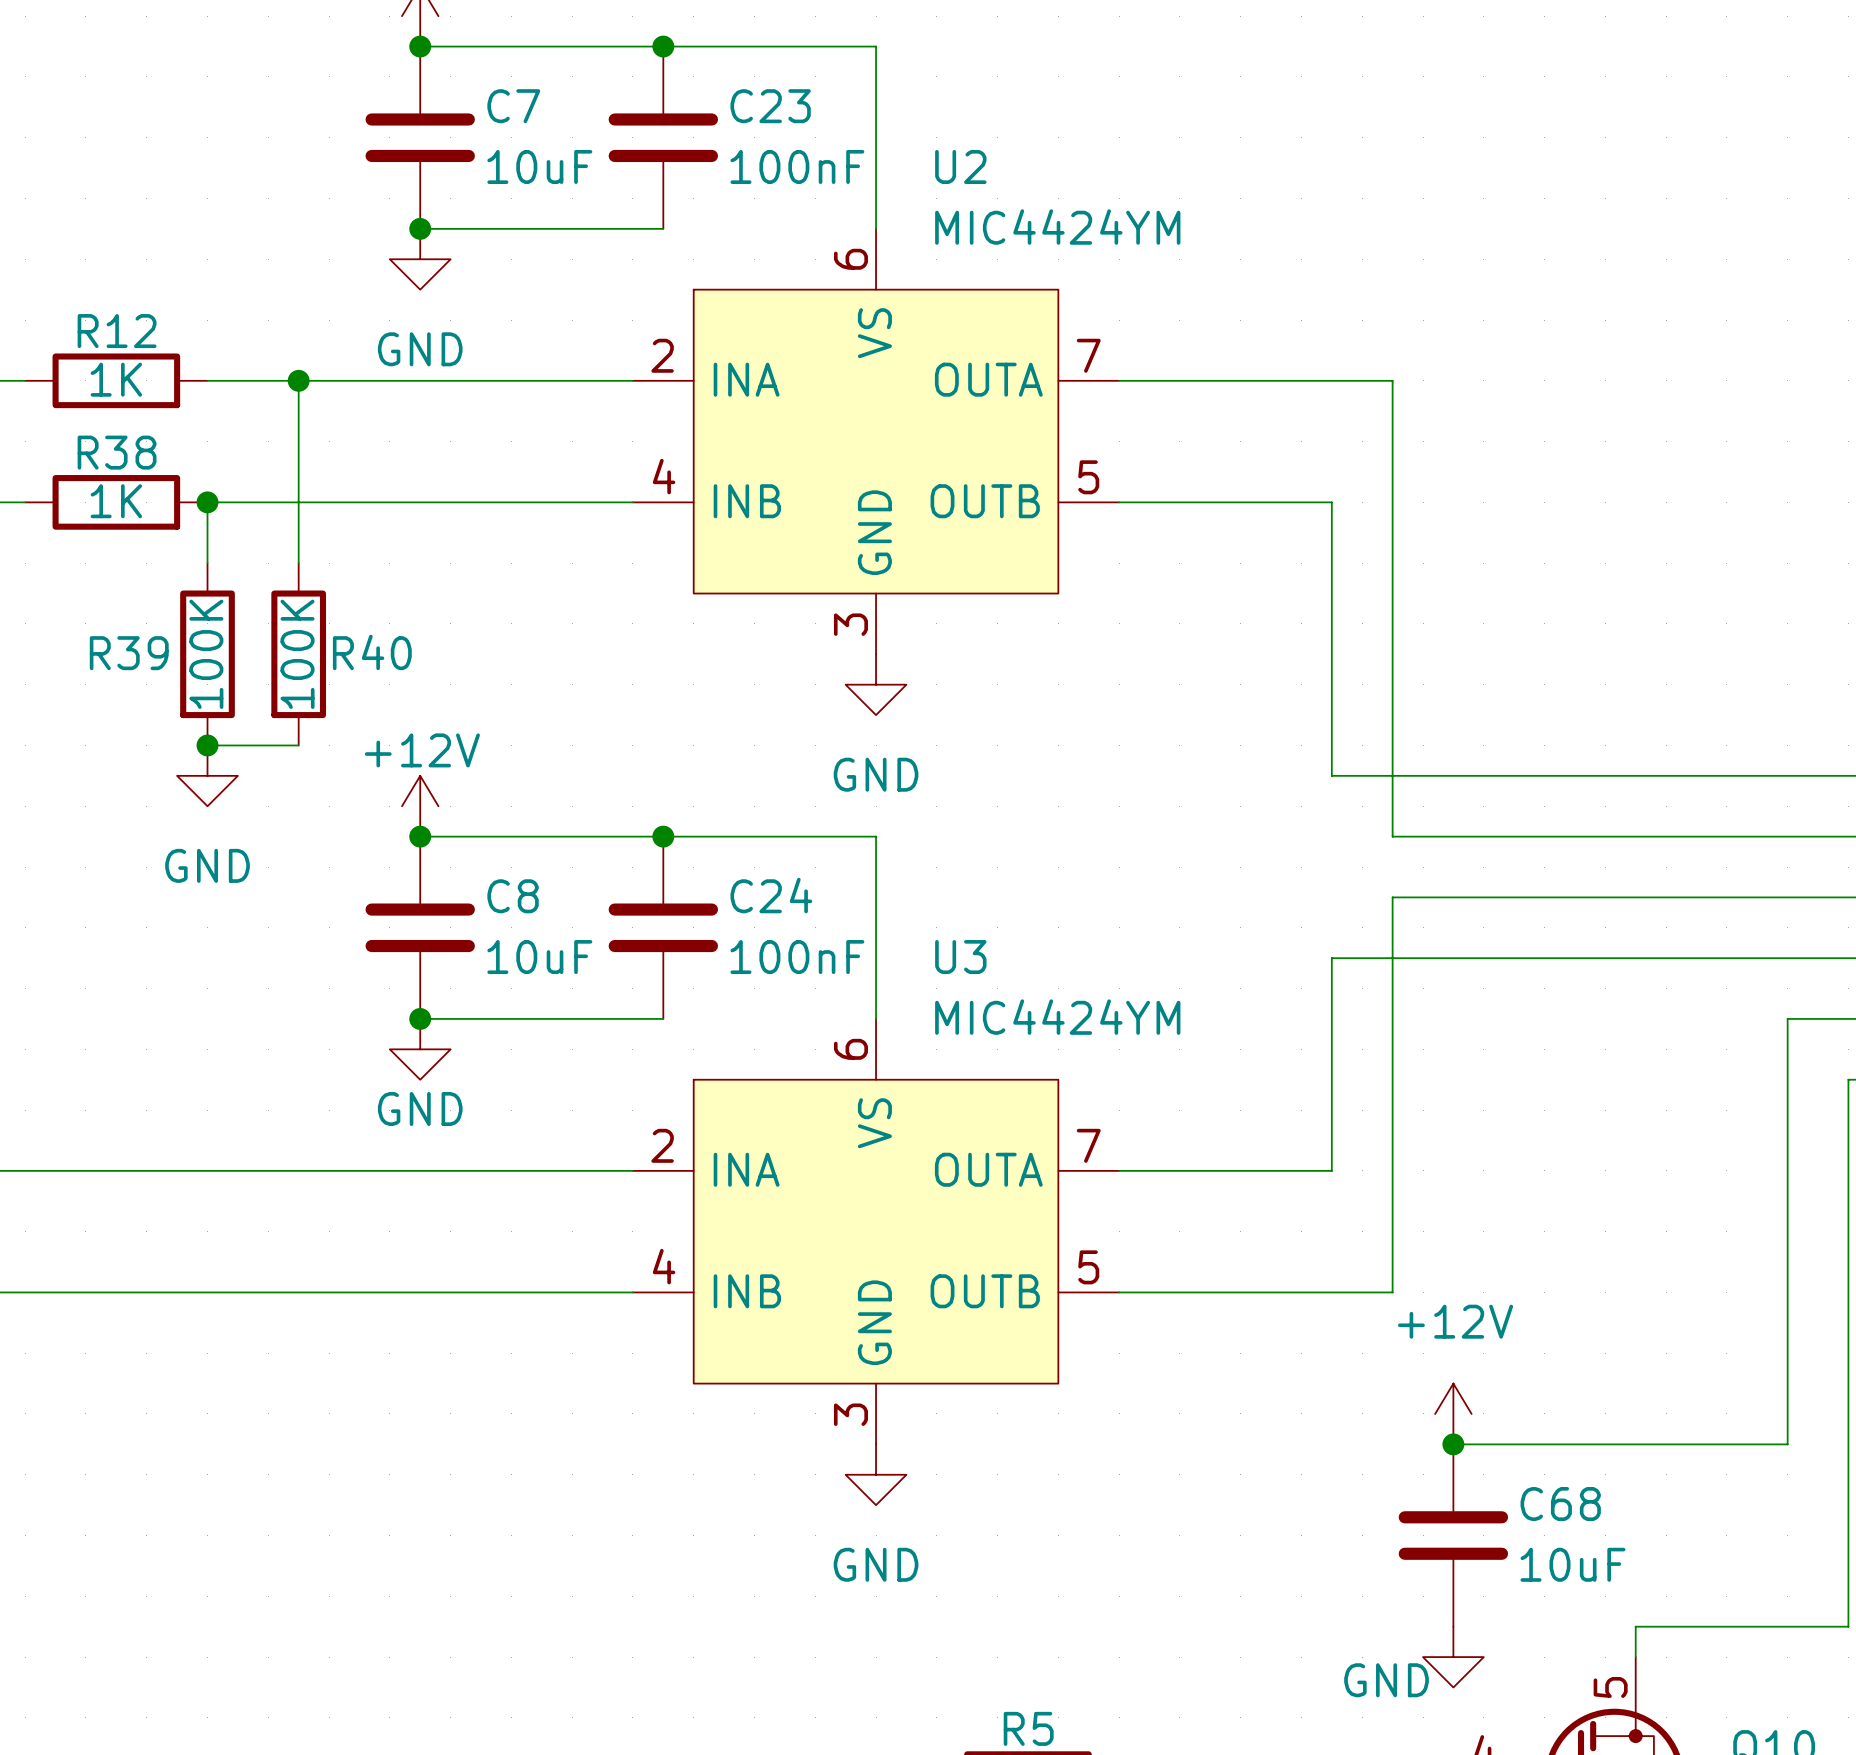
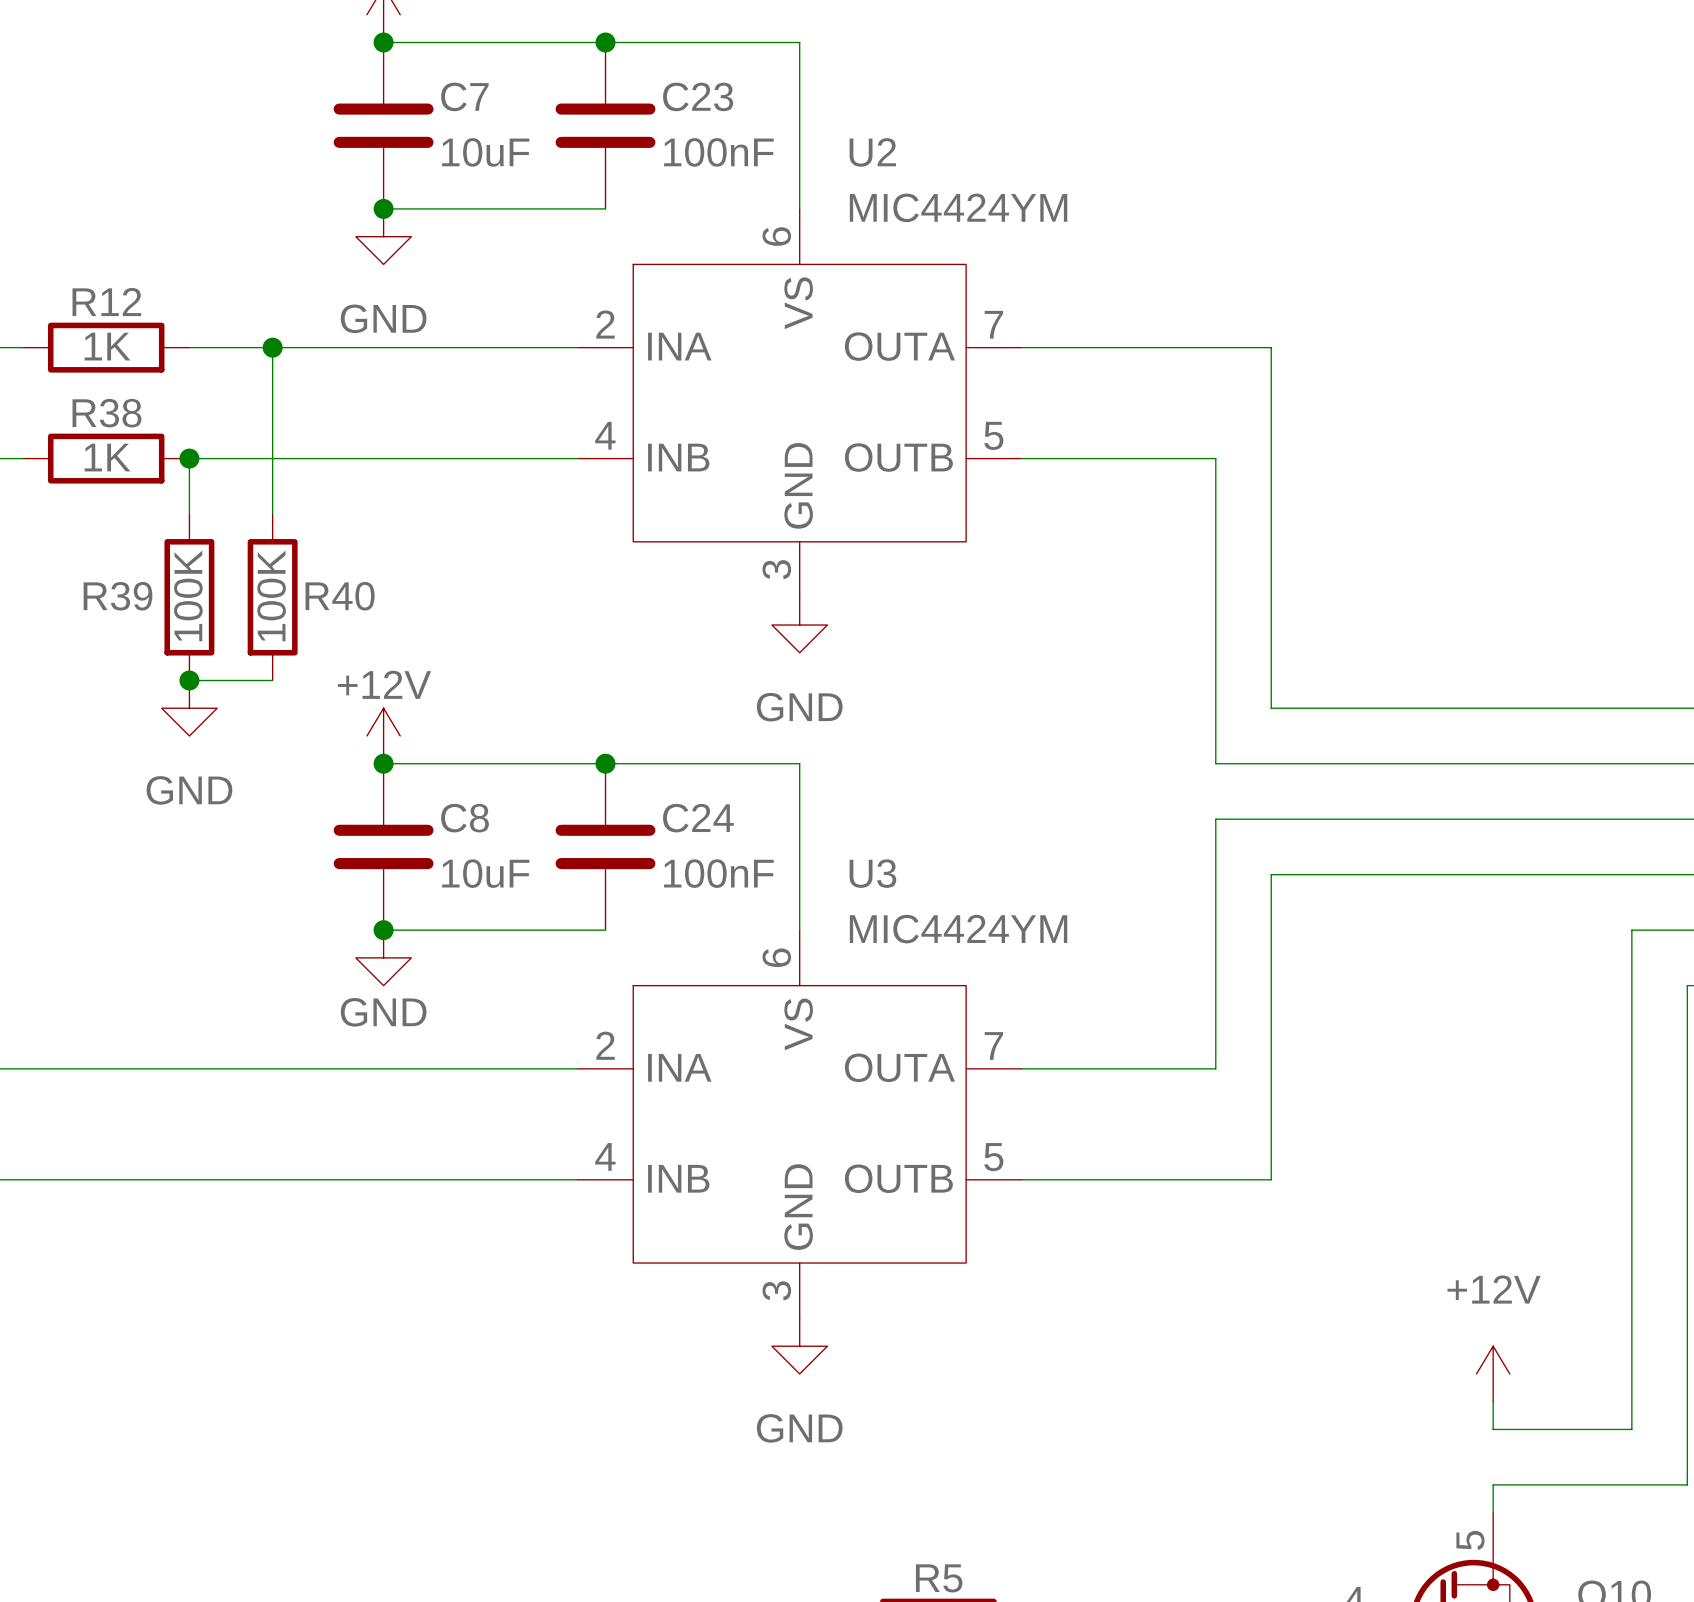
wire: (1331, 775) (1392, 775) (1392, 836) -> (1215, 708) (1215, 763) (1271, 763)
wire: (1392, 897) (1392, 958) (1331, 958) -> (1271, 819) (1215, 819) (1215, 874)
power symbol position: +12V (1453, 1413) -> +12V (1493, 1373)
wire: (1453, 1444) (1787, 1444) -> (1493, 1401) (1493, 1429) (1631, 1429) (1631, 1318)
junction: (1453, 1444) -> none
C68: 10uF (1453, 1535) -> none
power symbol: GND (1453, 1657) -> none

